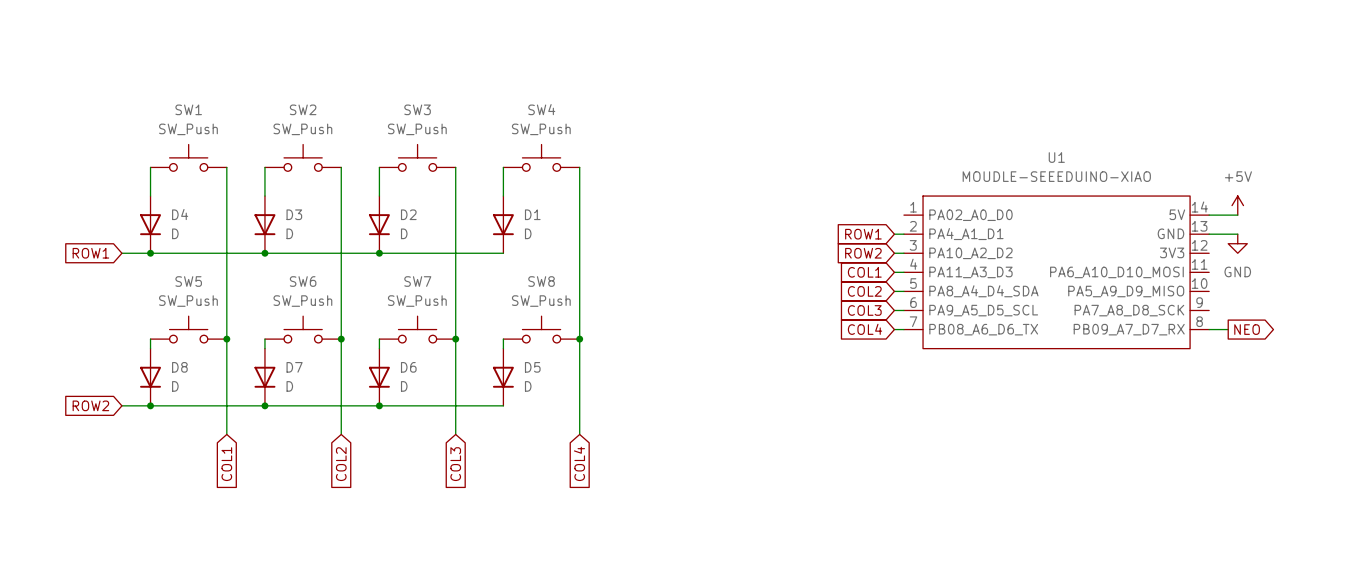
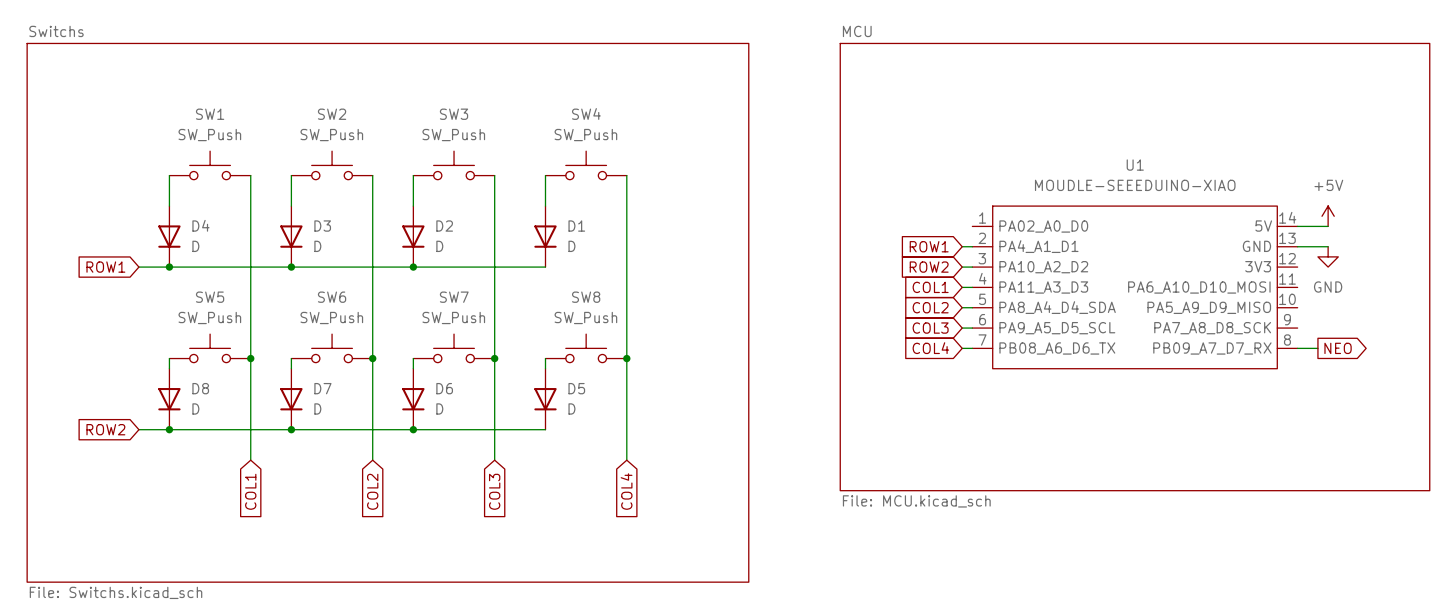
sheet MCU: none -> File: MCU.kicad_sch (1135, 267)
sheet Switchs: none -> File: Switchs.kicad_sch (387, 312)

